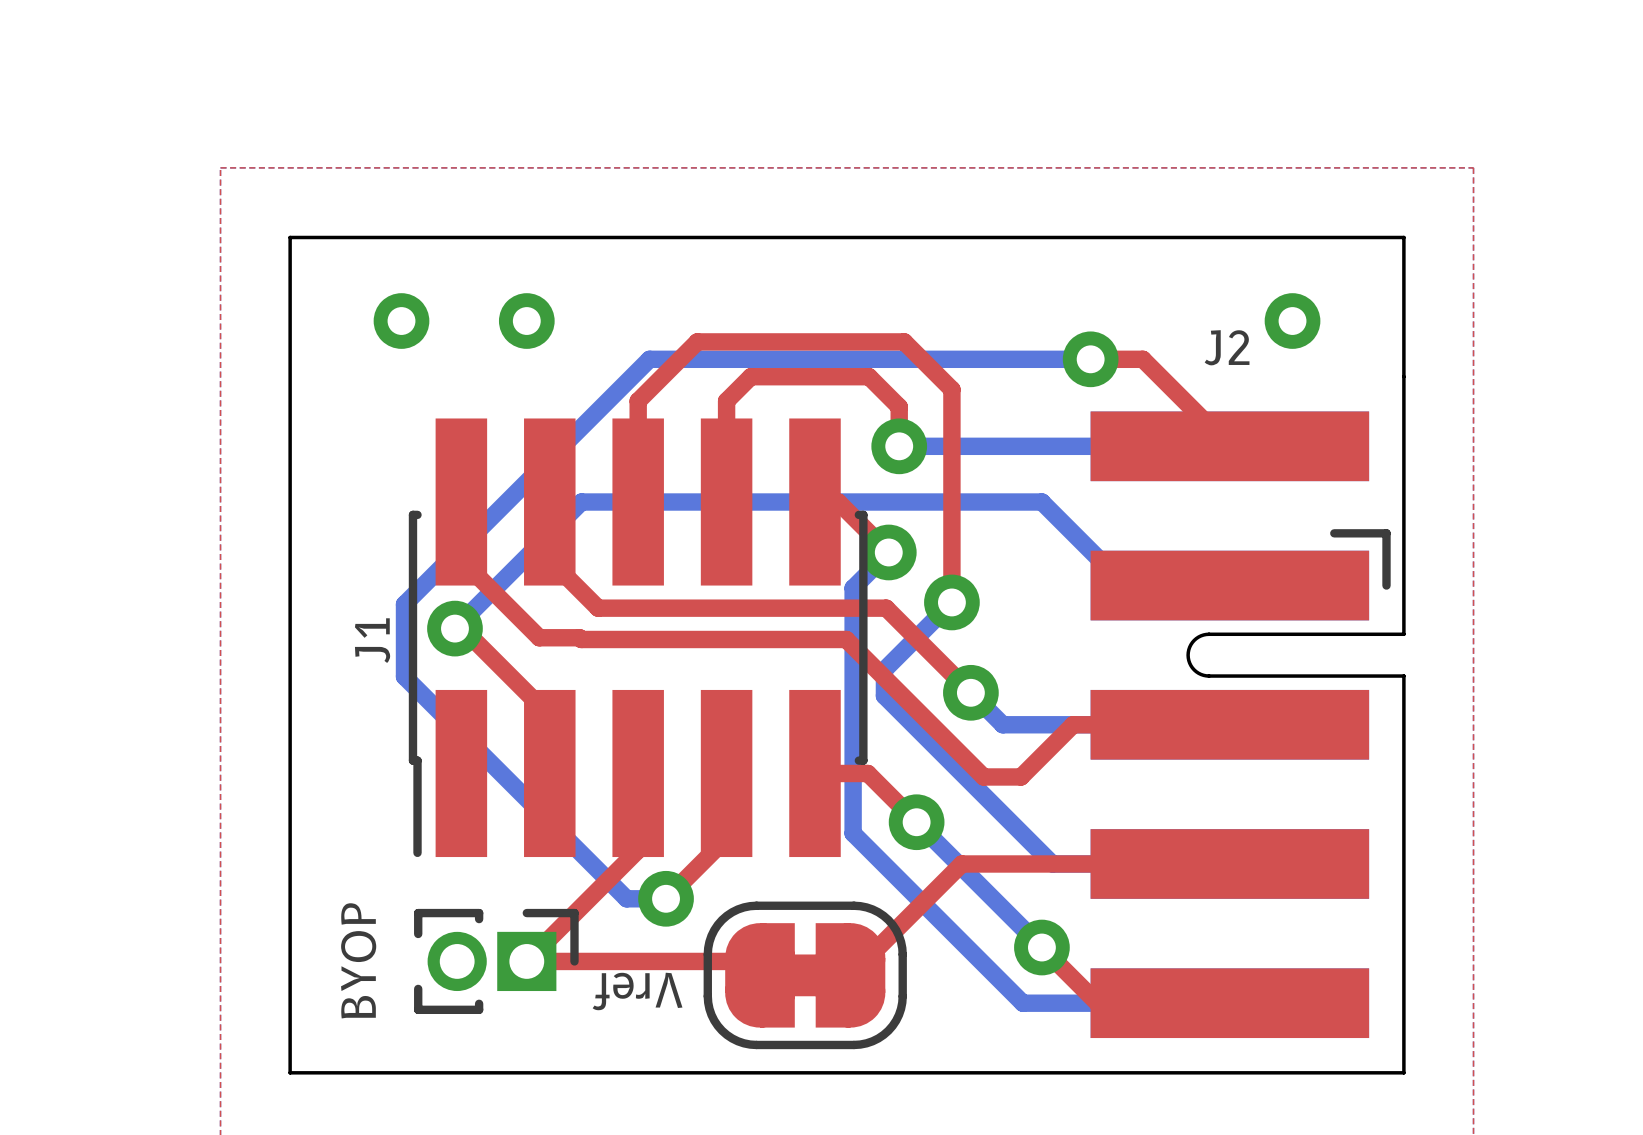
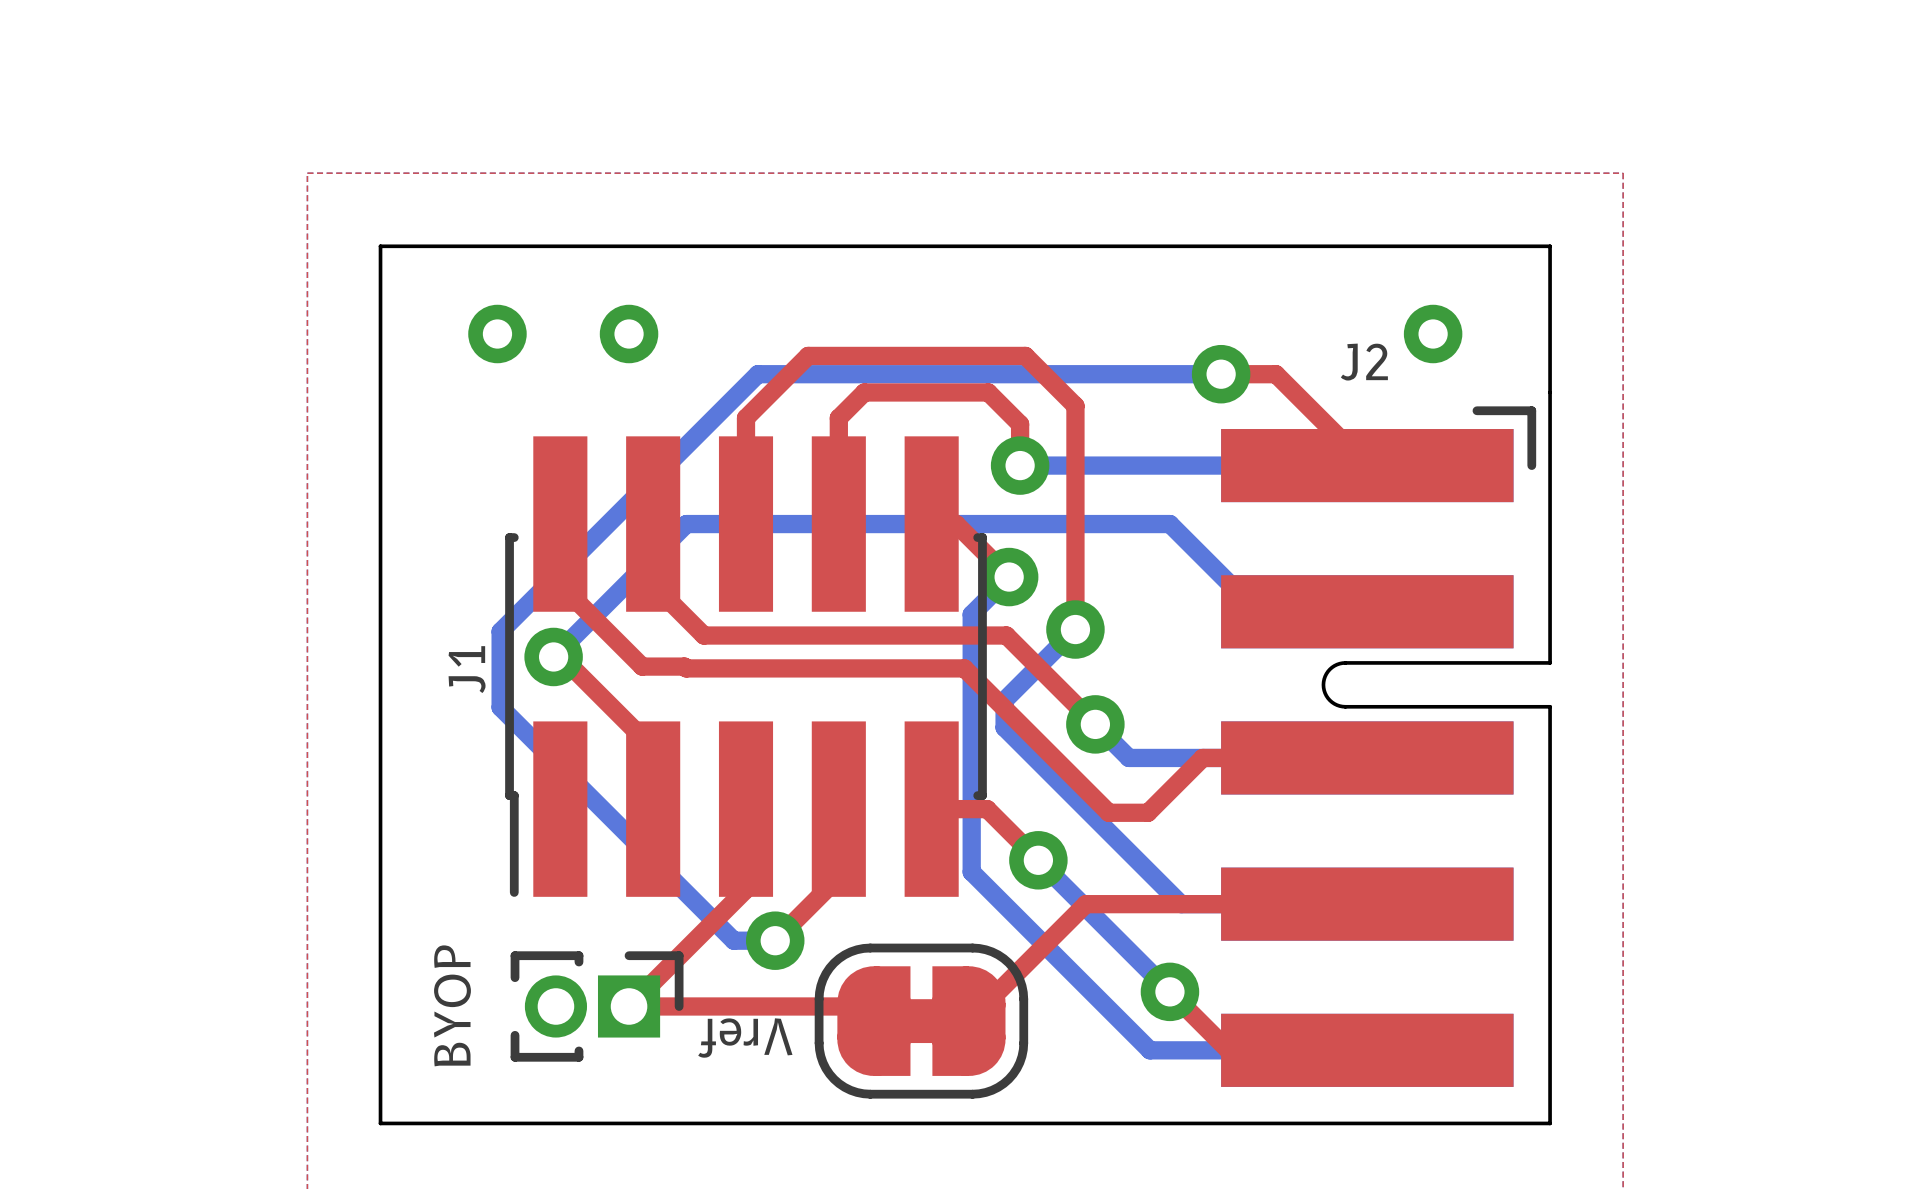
J2 footprint: [1090, 374, 1406, 1075] -> [1221, 390, 1552, 1126]

